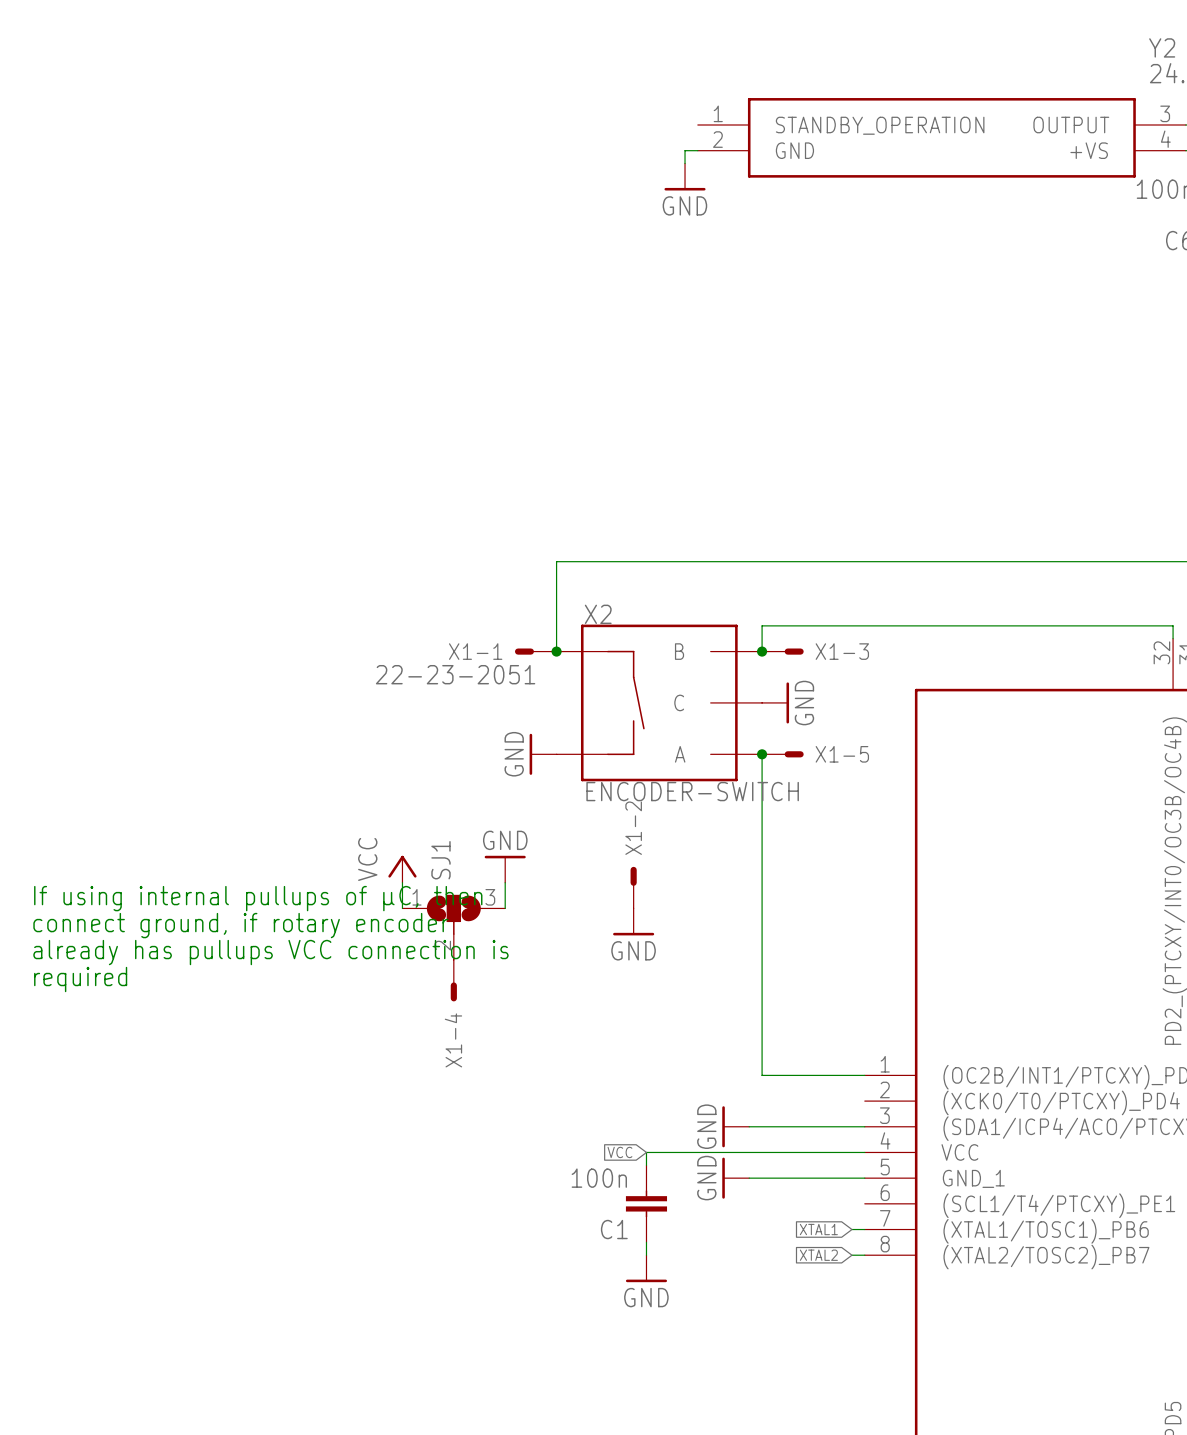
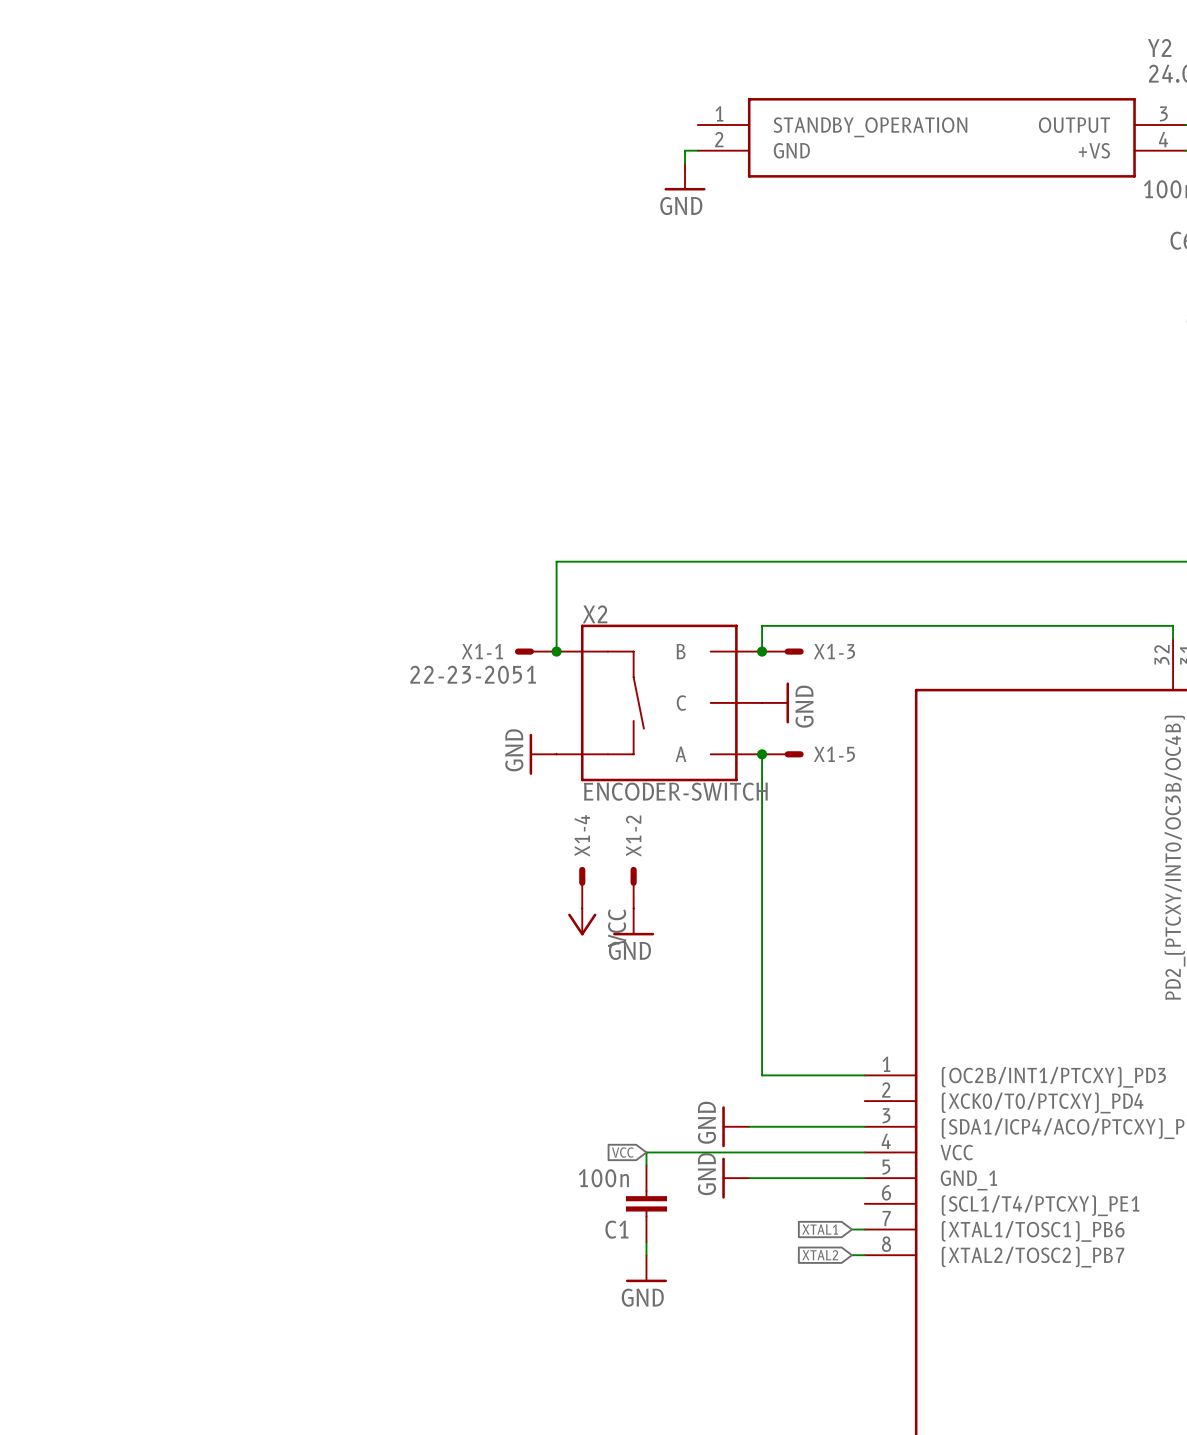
power symbol rotation: 0° (402, 866) -> 180° (582, 924)
power symbol position: VCC (402, 869) -> VCC (582, 921)
power symbol: GND (505, 869) -> none
wire: (402, 882) (402, 908) -> none
wire: (505, 882) (505, 908) -> none
text: If using internal pullups of µC, then (258, 898) -> none
text: connect ground, if rotary encoder (240, 925) -> none
SJ1: (453, 927) -> none
text: already has pullups VCC connection is (270, 952) -> none
text: required (80, 979) -> none
X1-4 position: (453, 980) -> (582, 887)
X1-4 rotation: 0° (453, 991) -> 180° (582, 876)

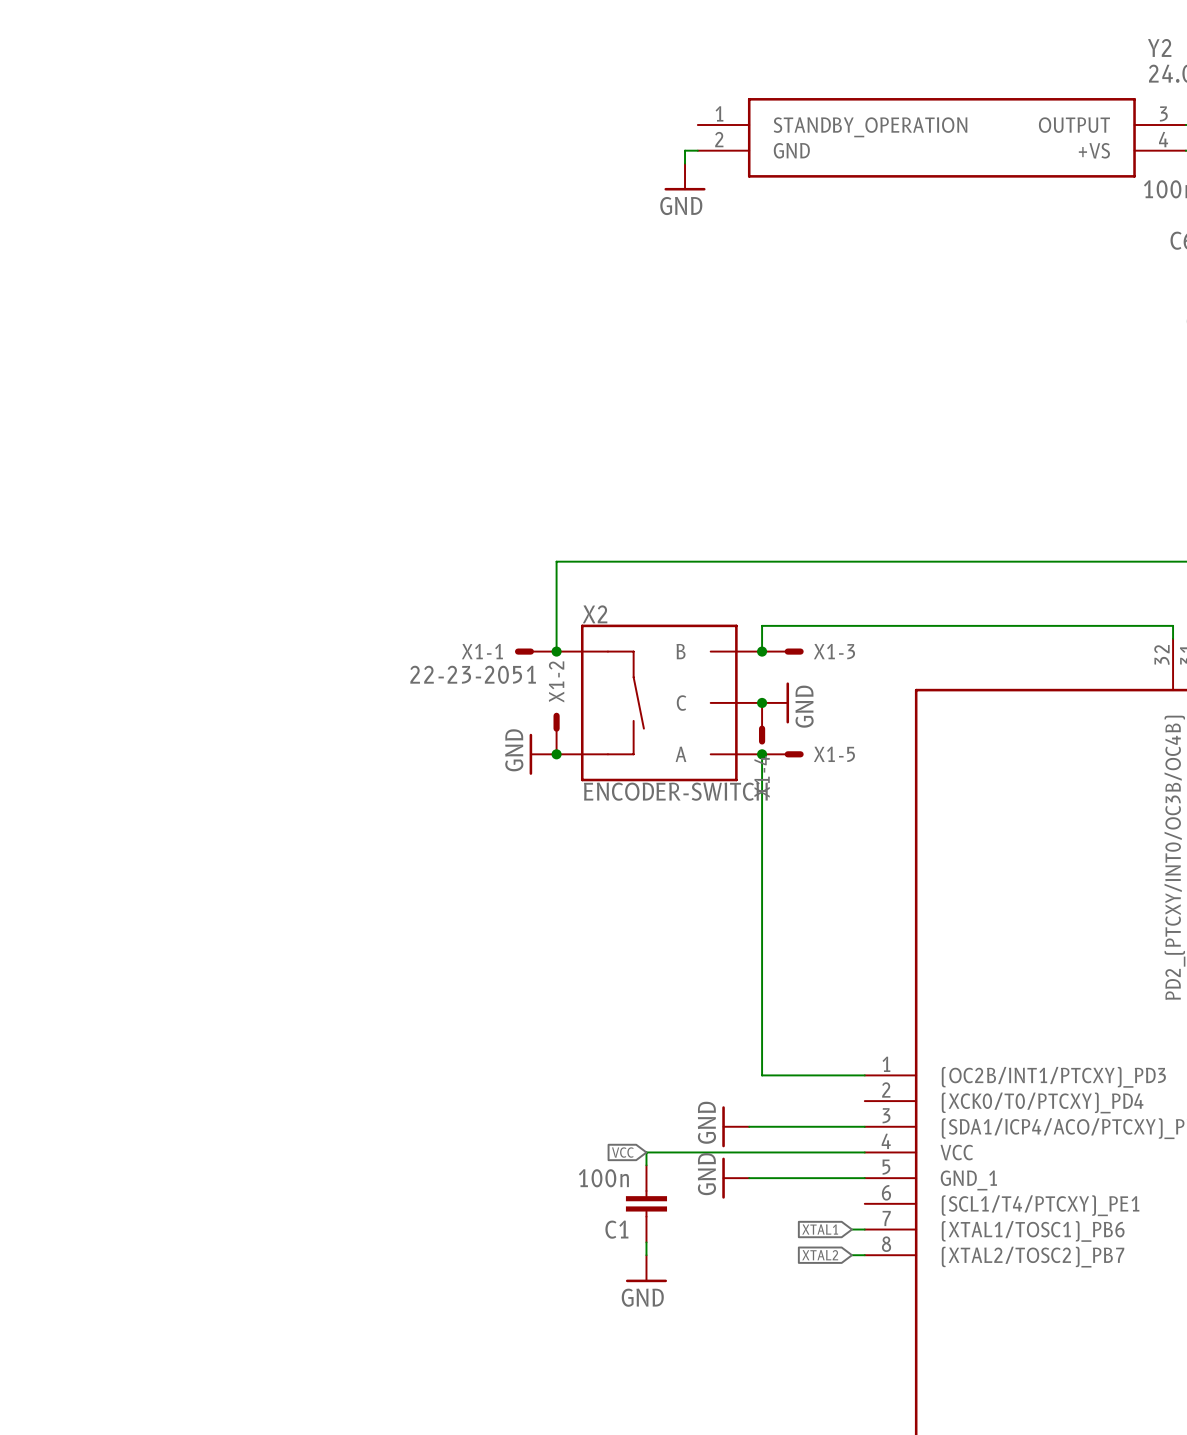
junction: none -> (762, 702)
junction: none -> (556, 754)
X1-4 rotation: 0° (582, 876) -> 180° (762, 735)
X1-4 position: (582, 887) -> (762, 723)
X1-2 position: (633, 887) -> (556, 733)
power symbol: VCC (582, 921) -> none
power symbol: GND (633, 921) -> none

